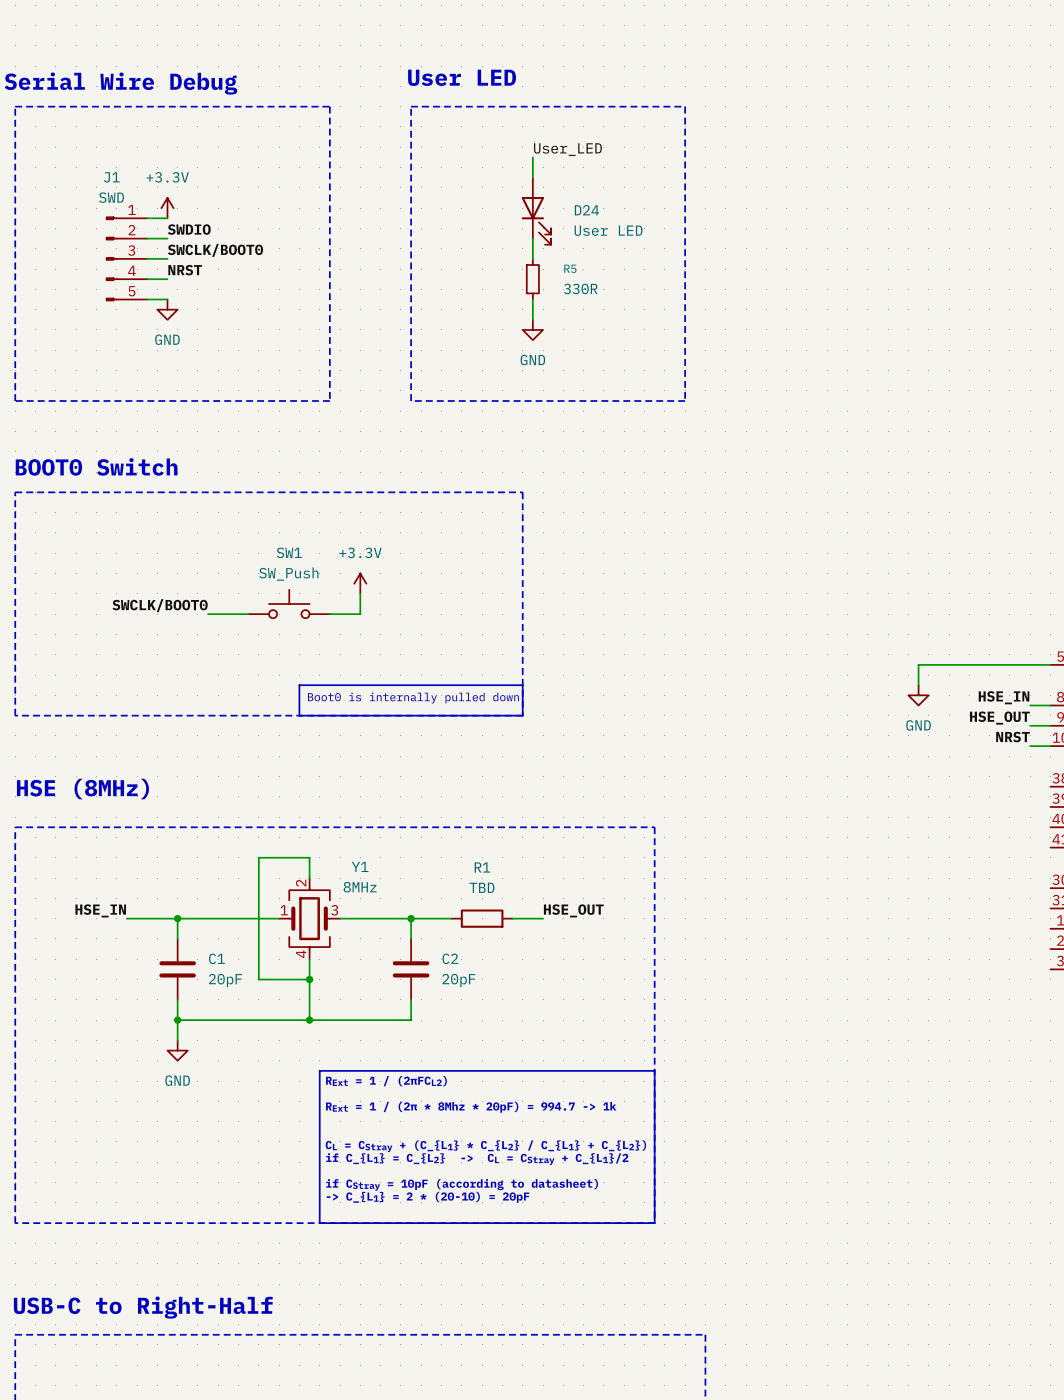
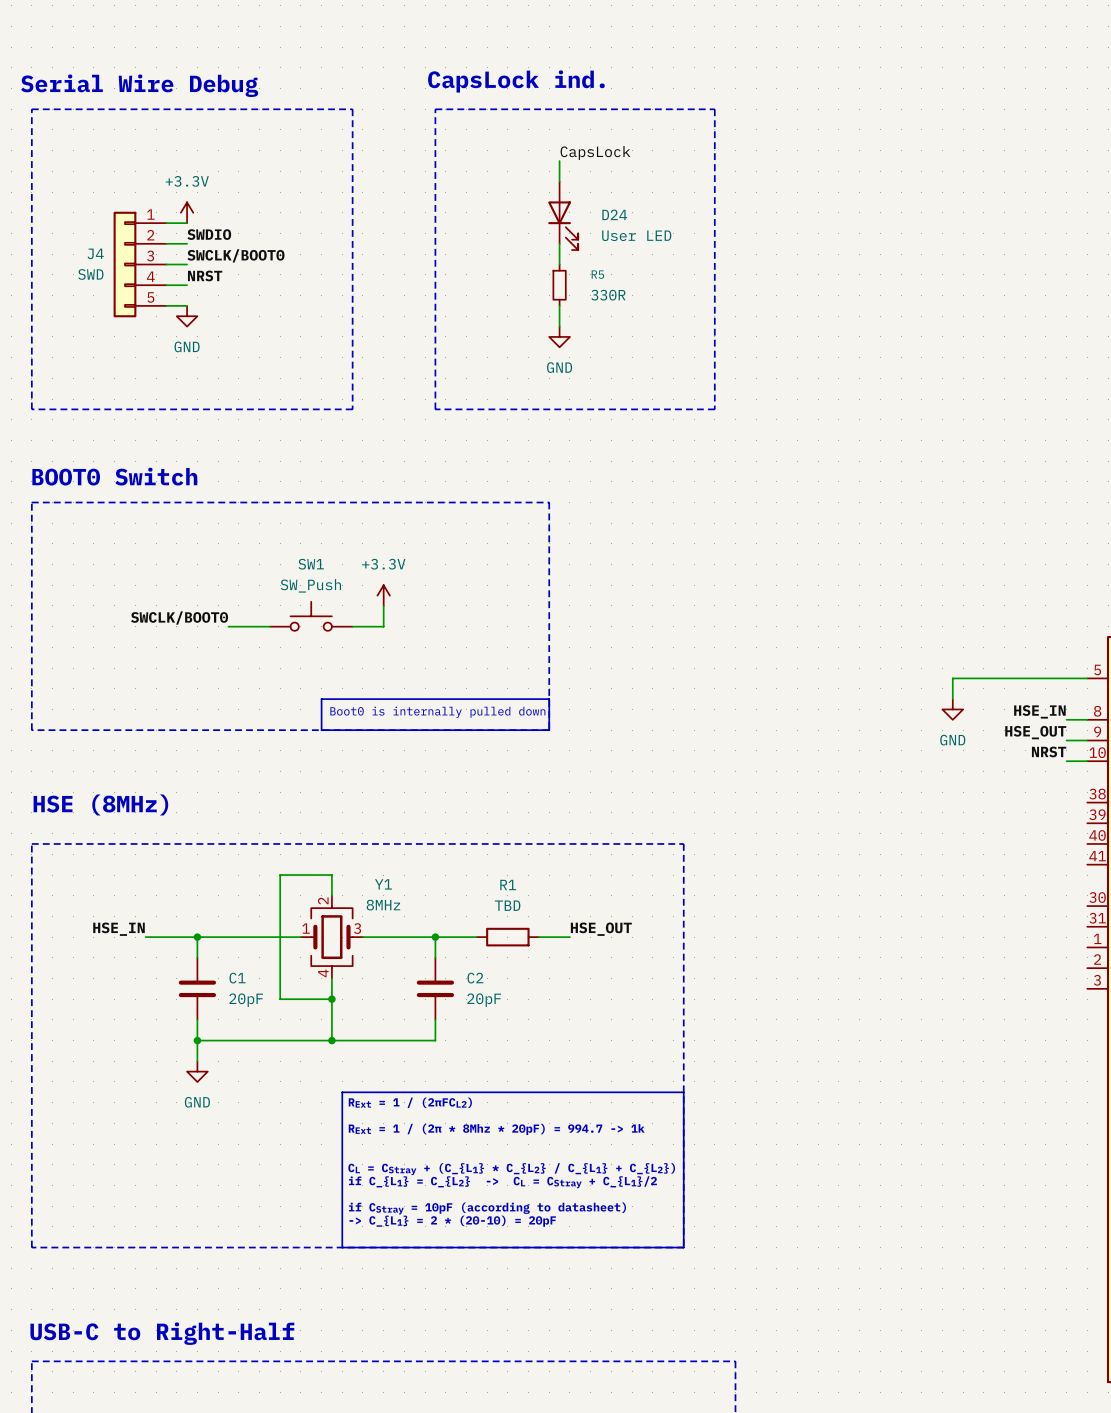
text: User LED (462, 77) -> none
text: none -> CapsLock ind. (516, 81)
label: User_LED (567, 149) -> CapsLock (595, 152)
J4: none -> SWD (139, 264)
J1: SWD (126, 258) -> none

